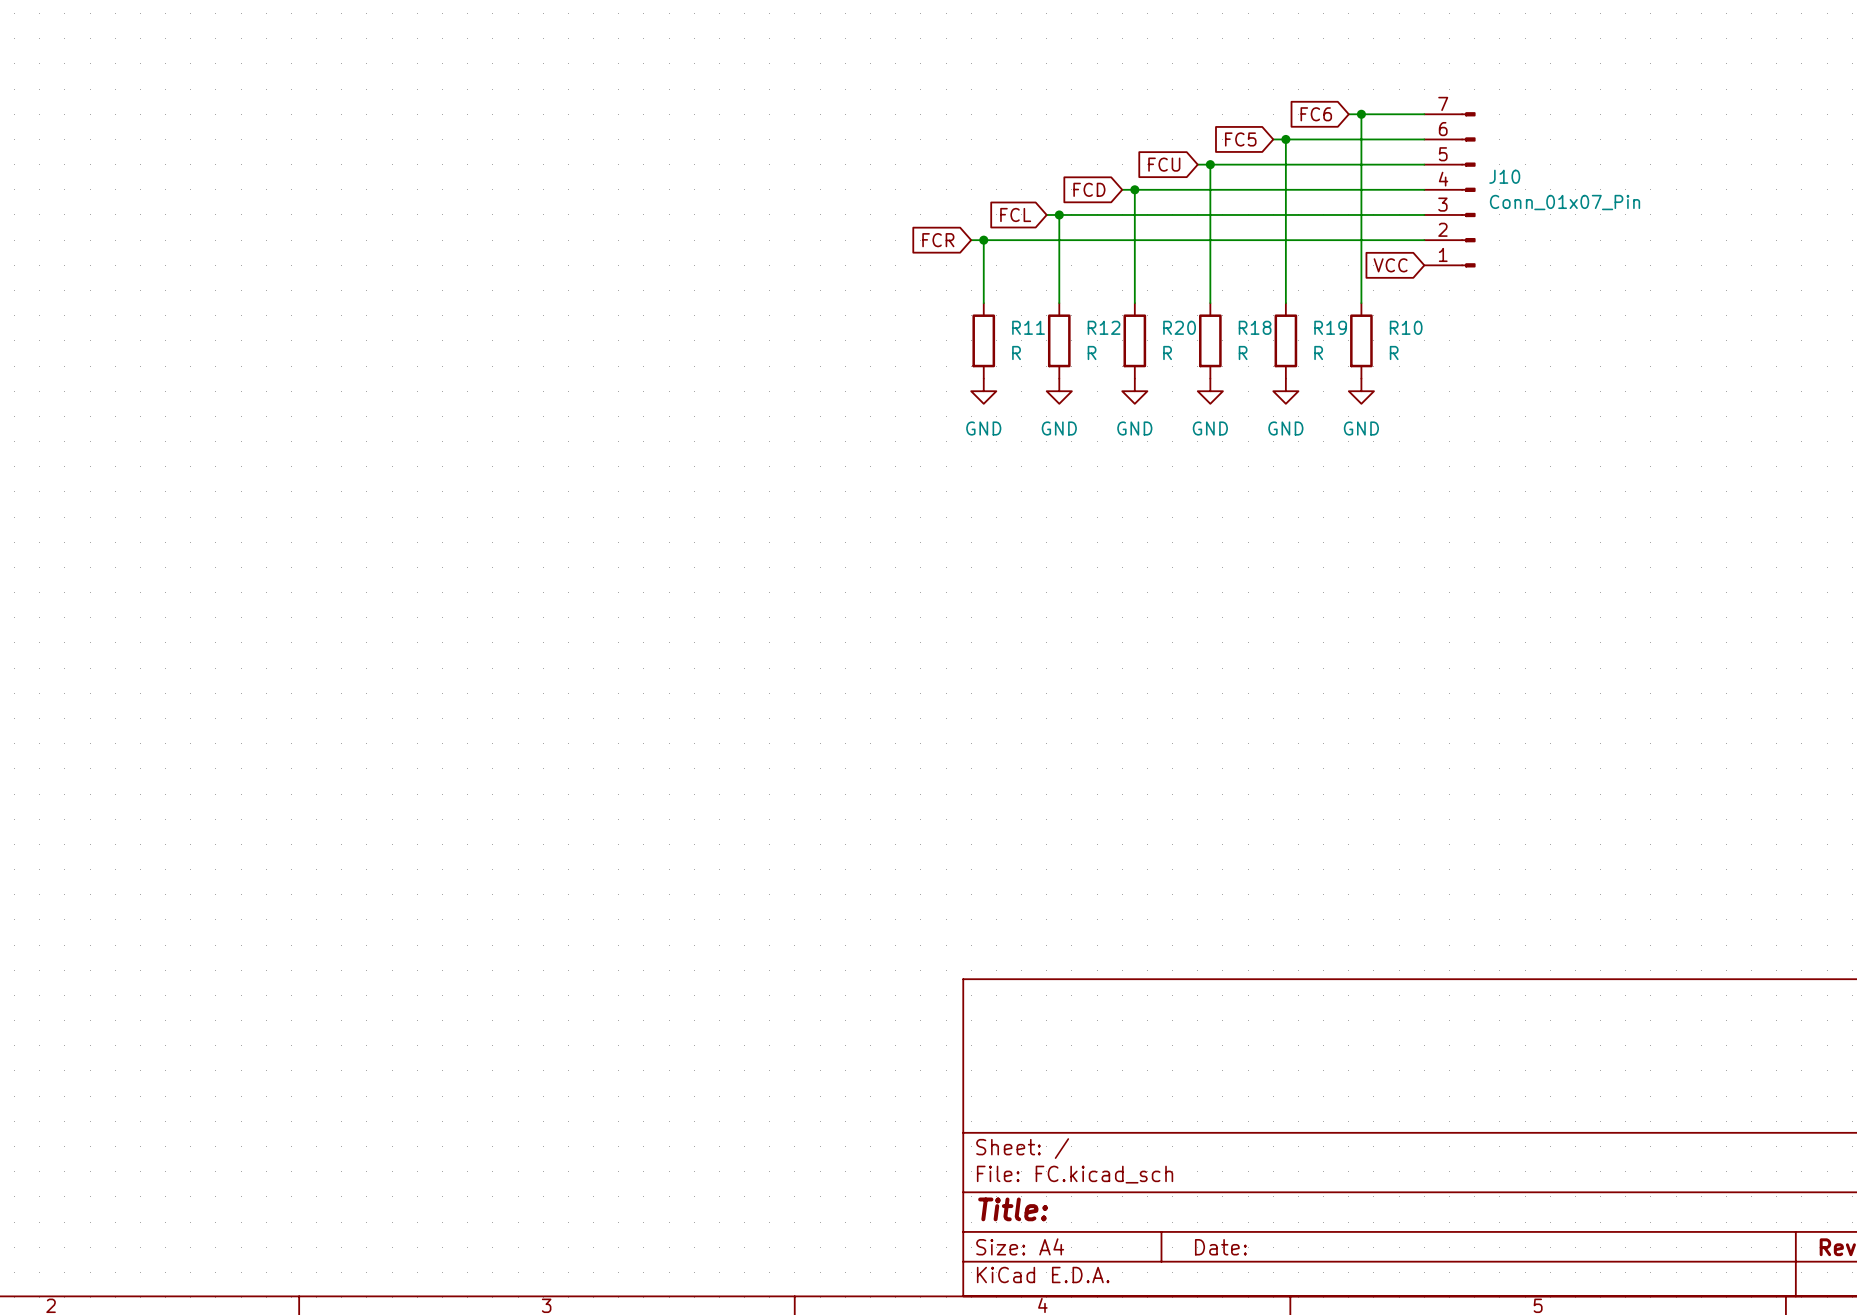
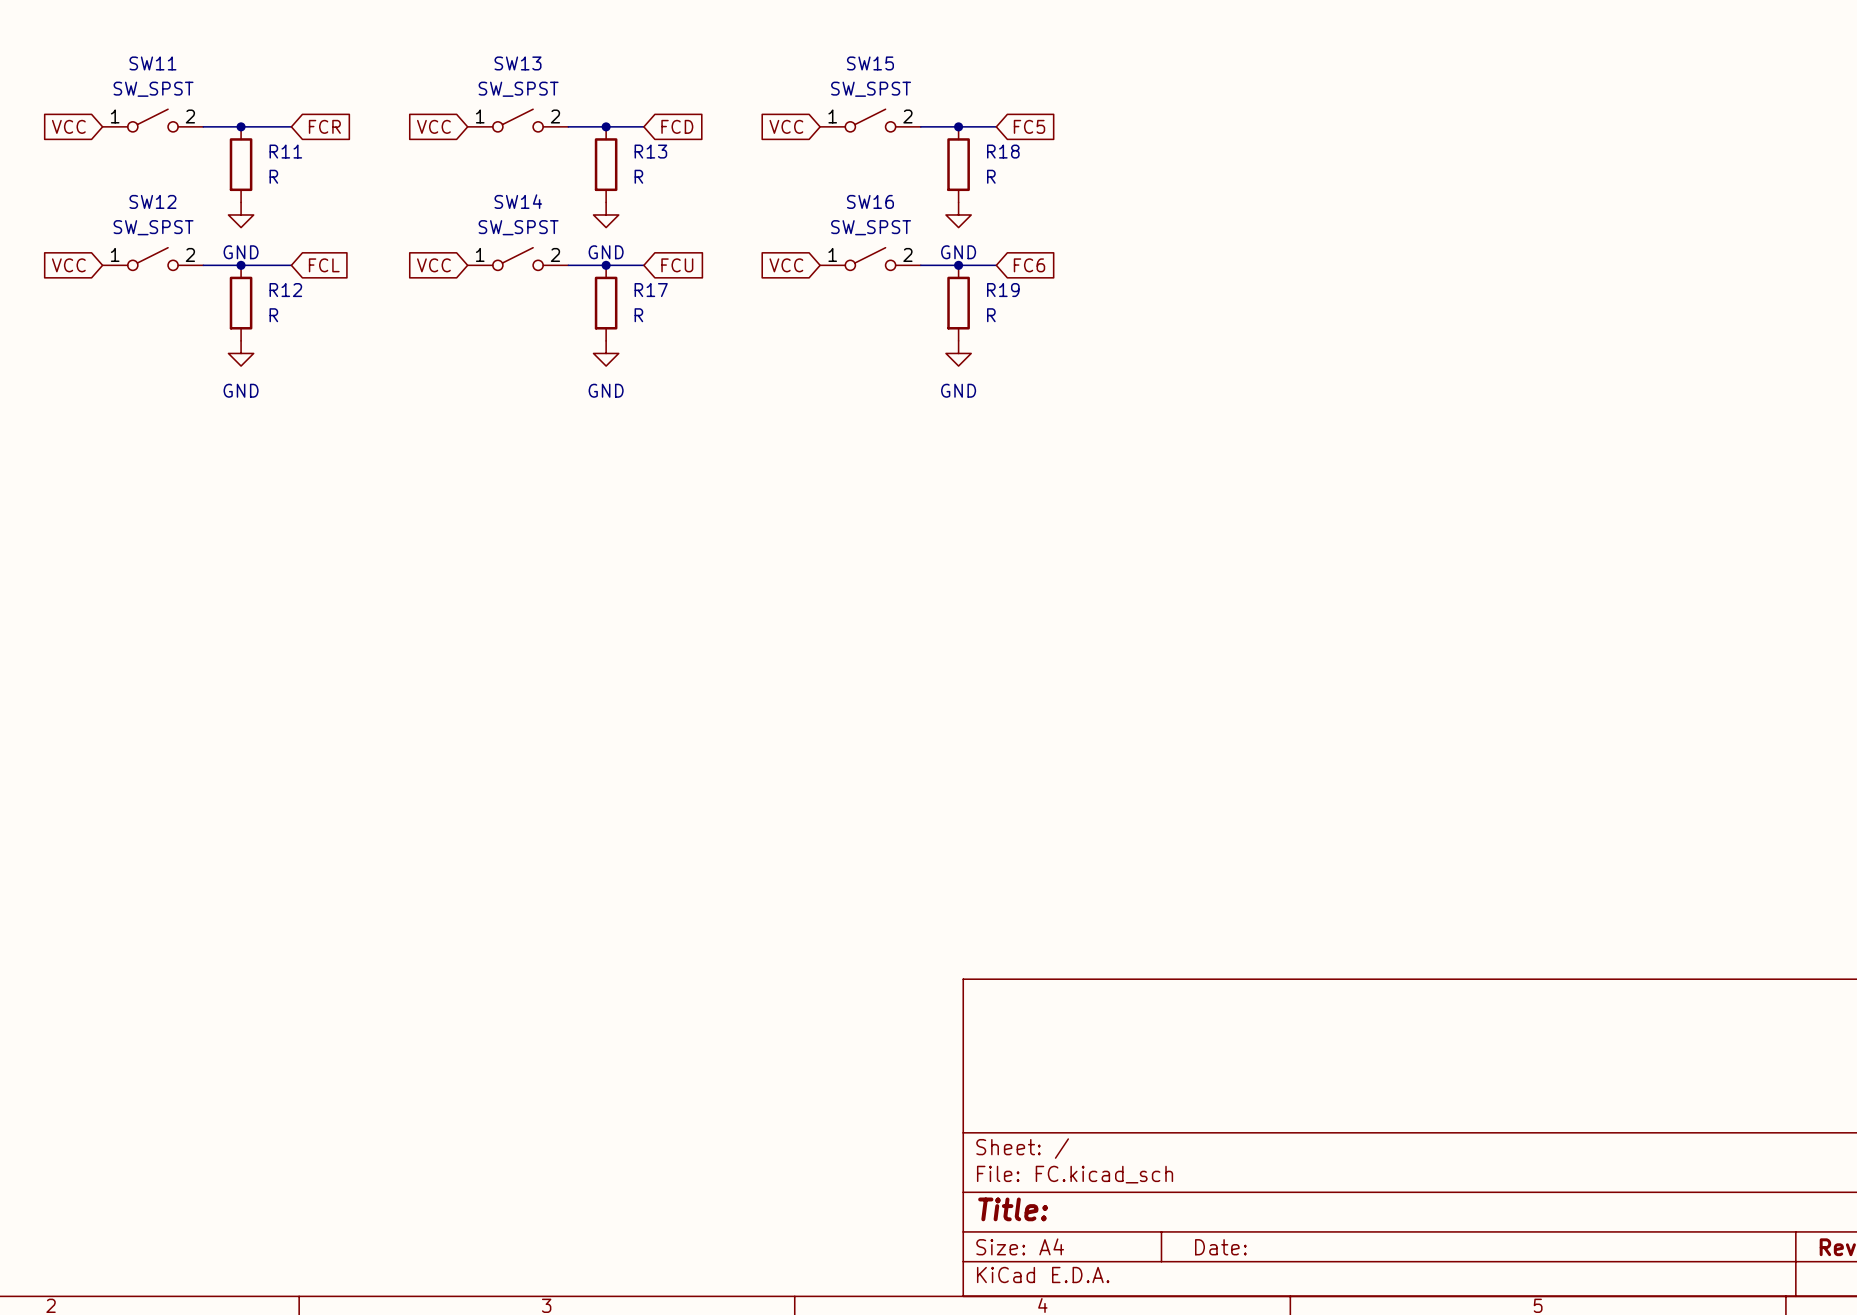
global label: FC6 (1316, 114) -> none
wire: (1348, 114) (1424, 114) -> none
wire: (1361, 114) (1361, 303) -> none
junction: (1361, 114) -> none
SW11: none -> SW_SPST (152, 120)
SW13: none -> SW_SPST (518, 120)
SW15: none -> SW_SPST (870, 120)
global label: none -> VCC (68, 126)
wire: none -> (203, 126) (291, 126)
junction: none -> (241, 126)
global label: none -> FCR (324, 126)
global label: none -> VCC (433, 126)
wire: none -> (568, 126) (643, 126)
junction: none -> (606, 126)
global label: none -> FCD (677, 126)
global label: none -> VCC (786, 126)
wire: none -> (920, 126) (996, 126)
junction: none -> (958, 126)
global label: none -> FC5 (1029, 126)
global label: FC5 (1240, 139) -> none
wire: (1273, 139) (1424, 139) -> none
wire: (1285, 139) (1285, 303) -> none
junction: (1285, 139) -> none
R13: none -> R (606, 164)
global label: FCU (1164, 164) -> none
wire: (1197, 164) (1424, 164) -> none
wire: (1210, 164) (1210, 303) -> none
junction: (1210, 164) -> none
global label: FCD (1089, 189) -> none
wire: (1122, 189) (1424, 189) -> none
wire: (1134, 189) (1134, 303) -> none
junction: (1134, 189) -> none
J10: Conn_01x07_Pin (1449, 189) -> none
power symbol: none -> GND (241, 214)
power symbol: none -> GND (606, 214)
power symbol: none -> GND (958, 214)
global label: FCL (1015, 214) -> none
wire: (1046, 214) (1424, 214) -> none
wire: (1059, 214) (1059, 303) -> none
junction: (1059, 214) -> none
global label: FCR (938, 240) -> none
wire: (971, 240) (1424, 240) -> none
wire: (983, 240) (983, 303) -> none
junction position: (983, 240) -> (958, 265)
SW12: none -> SW_SPST (152, 259)
SW14: none -> SW_SPST (518, 259)
SW16: none -> SW_SPST (870, 259)
global label: none -> VCC (68, 265)
wire: none -> (203, 265) (291, 265)
junction: none -> (241, 265)
global label: none -> FCL (324, 265)
global label: none -> VCC (433, 265)
wire: none -> (568, 265) (643, 265)
junction: none -> (606, 265)
global label: none -> FCU (677, 265)
global label: none -> VCC (786, 265)
wire: none -> (920, 265) (996, 265)
global label: none -> FC6 (1029, 265)
global label: VCC (1390, 265) -> none
R17: none -> R (606, 303)
R11 position: (983, 340) -> (241, 164)
R12 position: (1059, 340) -> (241, 303)
R20: R (1134, 340) -> none
R18 position: (1210, 340) -> (958, 164)
R19 position: (1285, 340) -> (958, 303)
R10: R (1361, 340) -> none
power symbol: none -> GND (241, 353)
power symbol: none -> GND (606, 353)
power symbol position: GND (983, 391) -> GND (958, 353)
power symbol: GND (1059, 391) -> none
power symbol: GND (1134, 391) -> none
power symbol: GND (1210, 391) -> none
power symbol: GND (1285, 391) -> none
power symbol: GND (1361, 391) -> none

